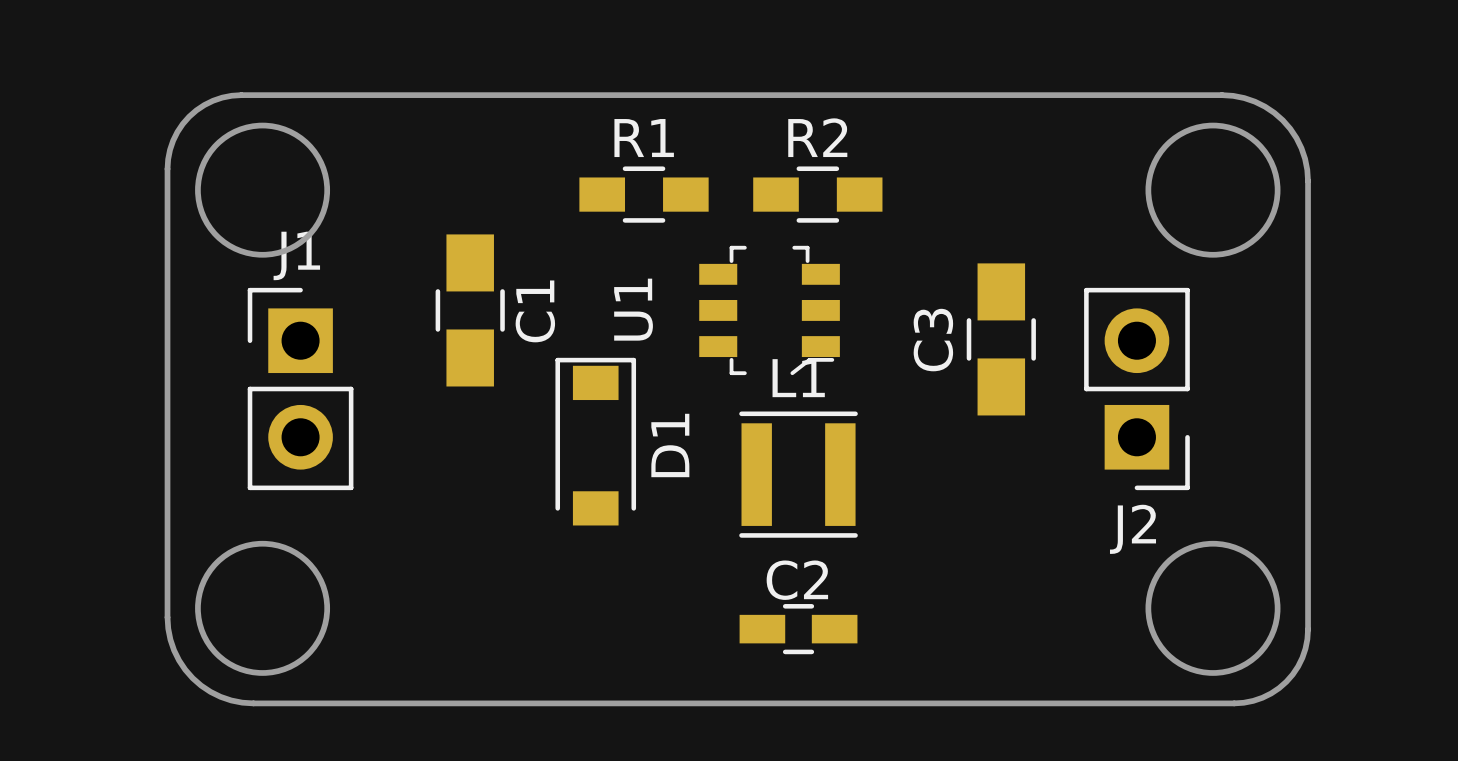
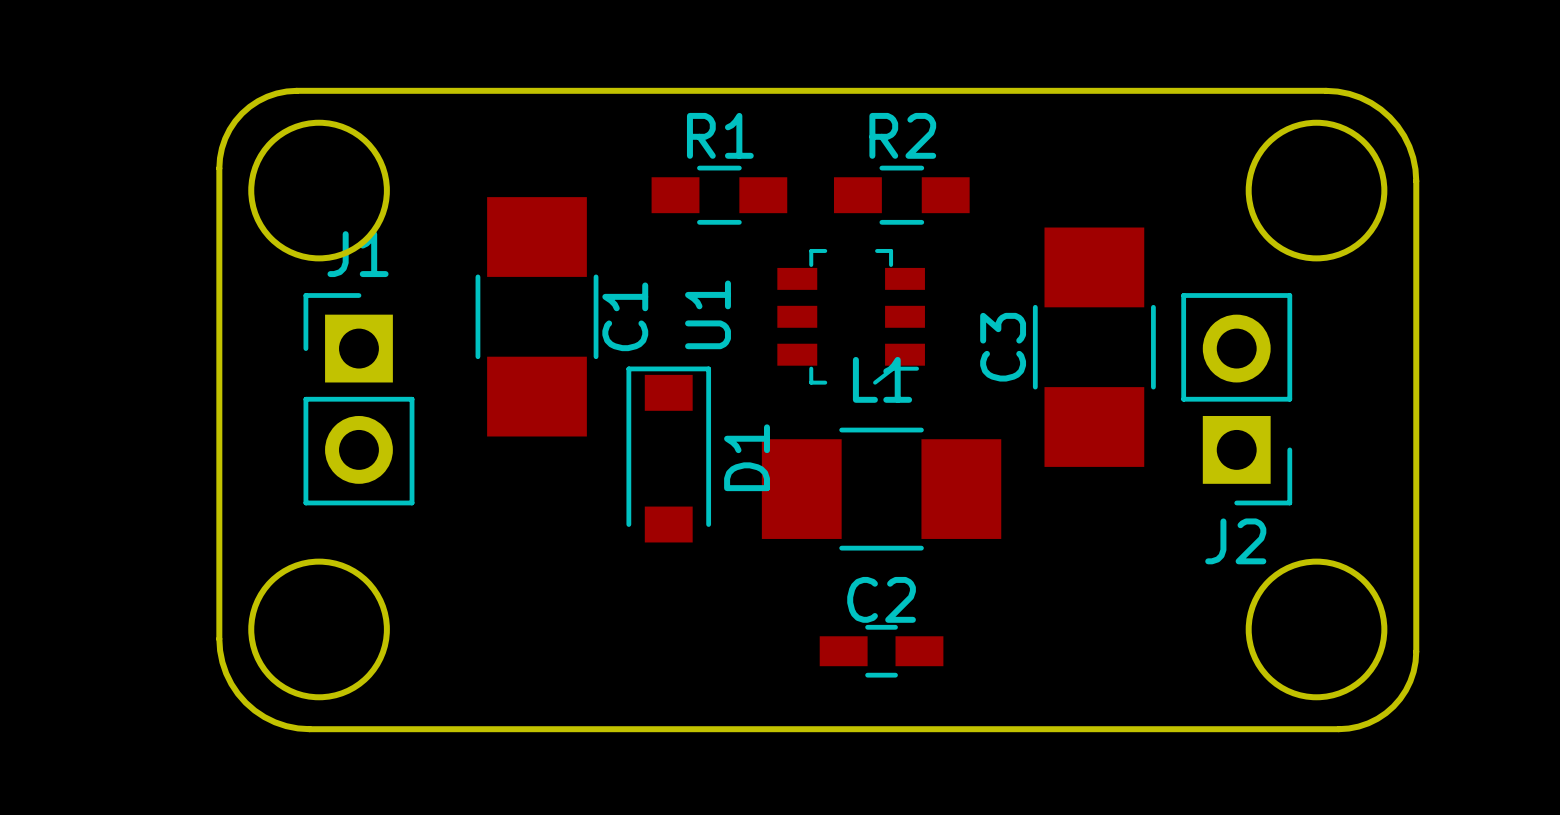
C1 footprint: [435, 234, 505, 387] -> [475, 197, 599, 437]
C3 footprint: [966, 263, 1036, 416] -> [1032, 227, 1156, 467]
L1 footprint: [739, 411, 858, 538] -> [761, 427, 1002, 551]

